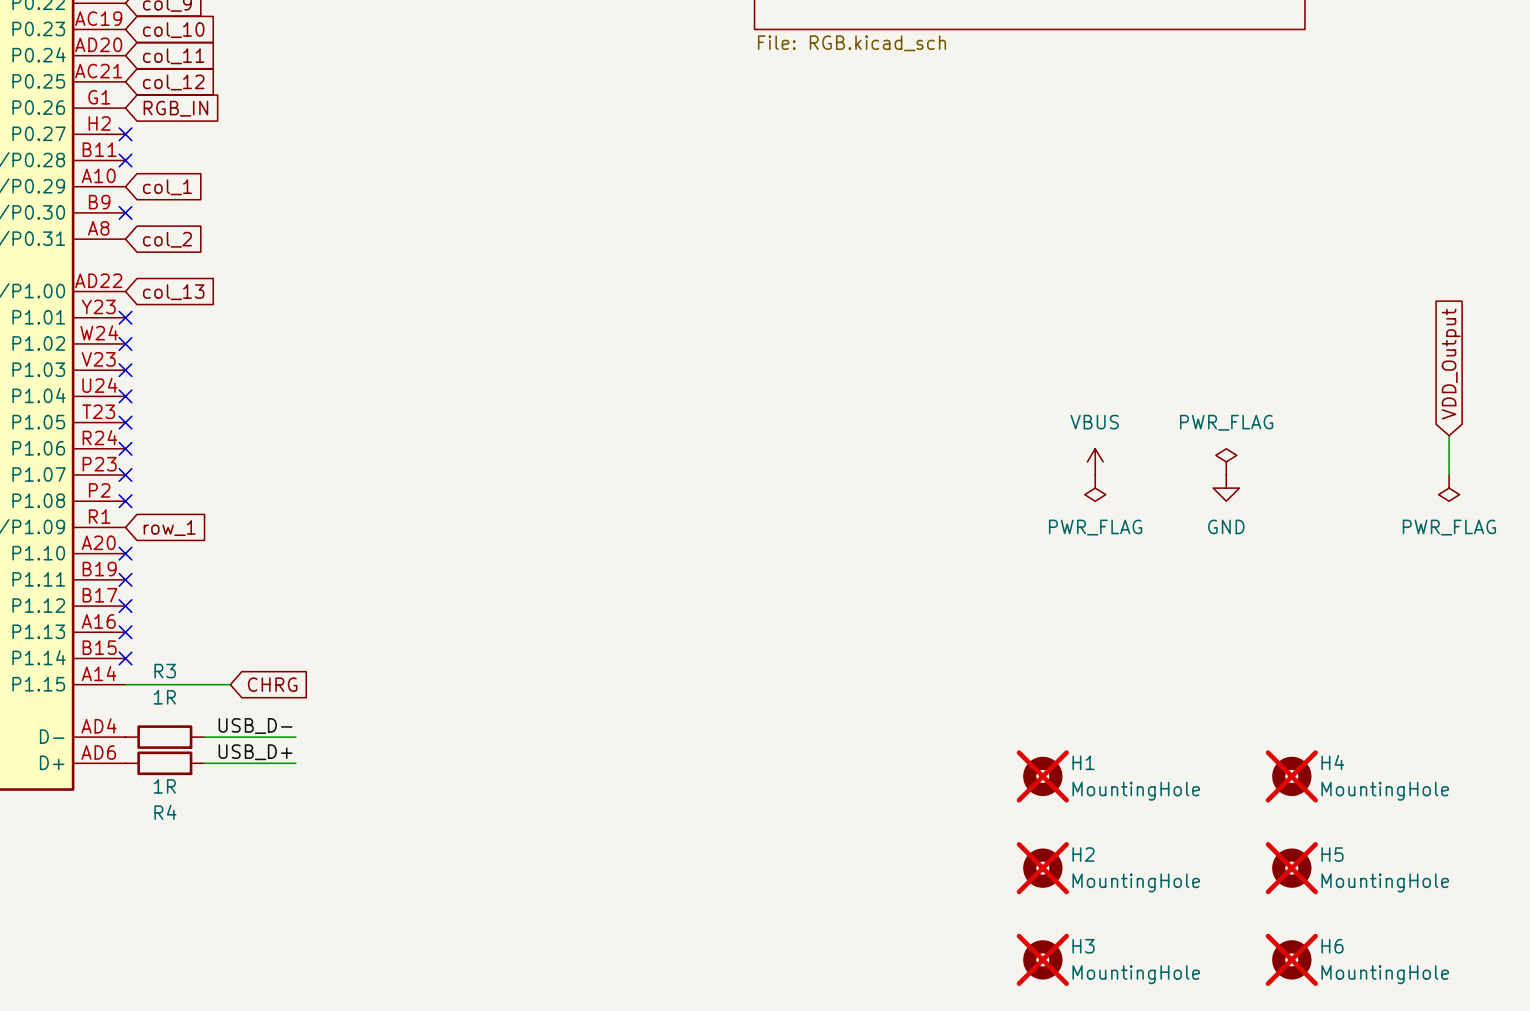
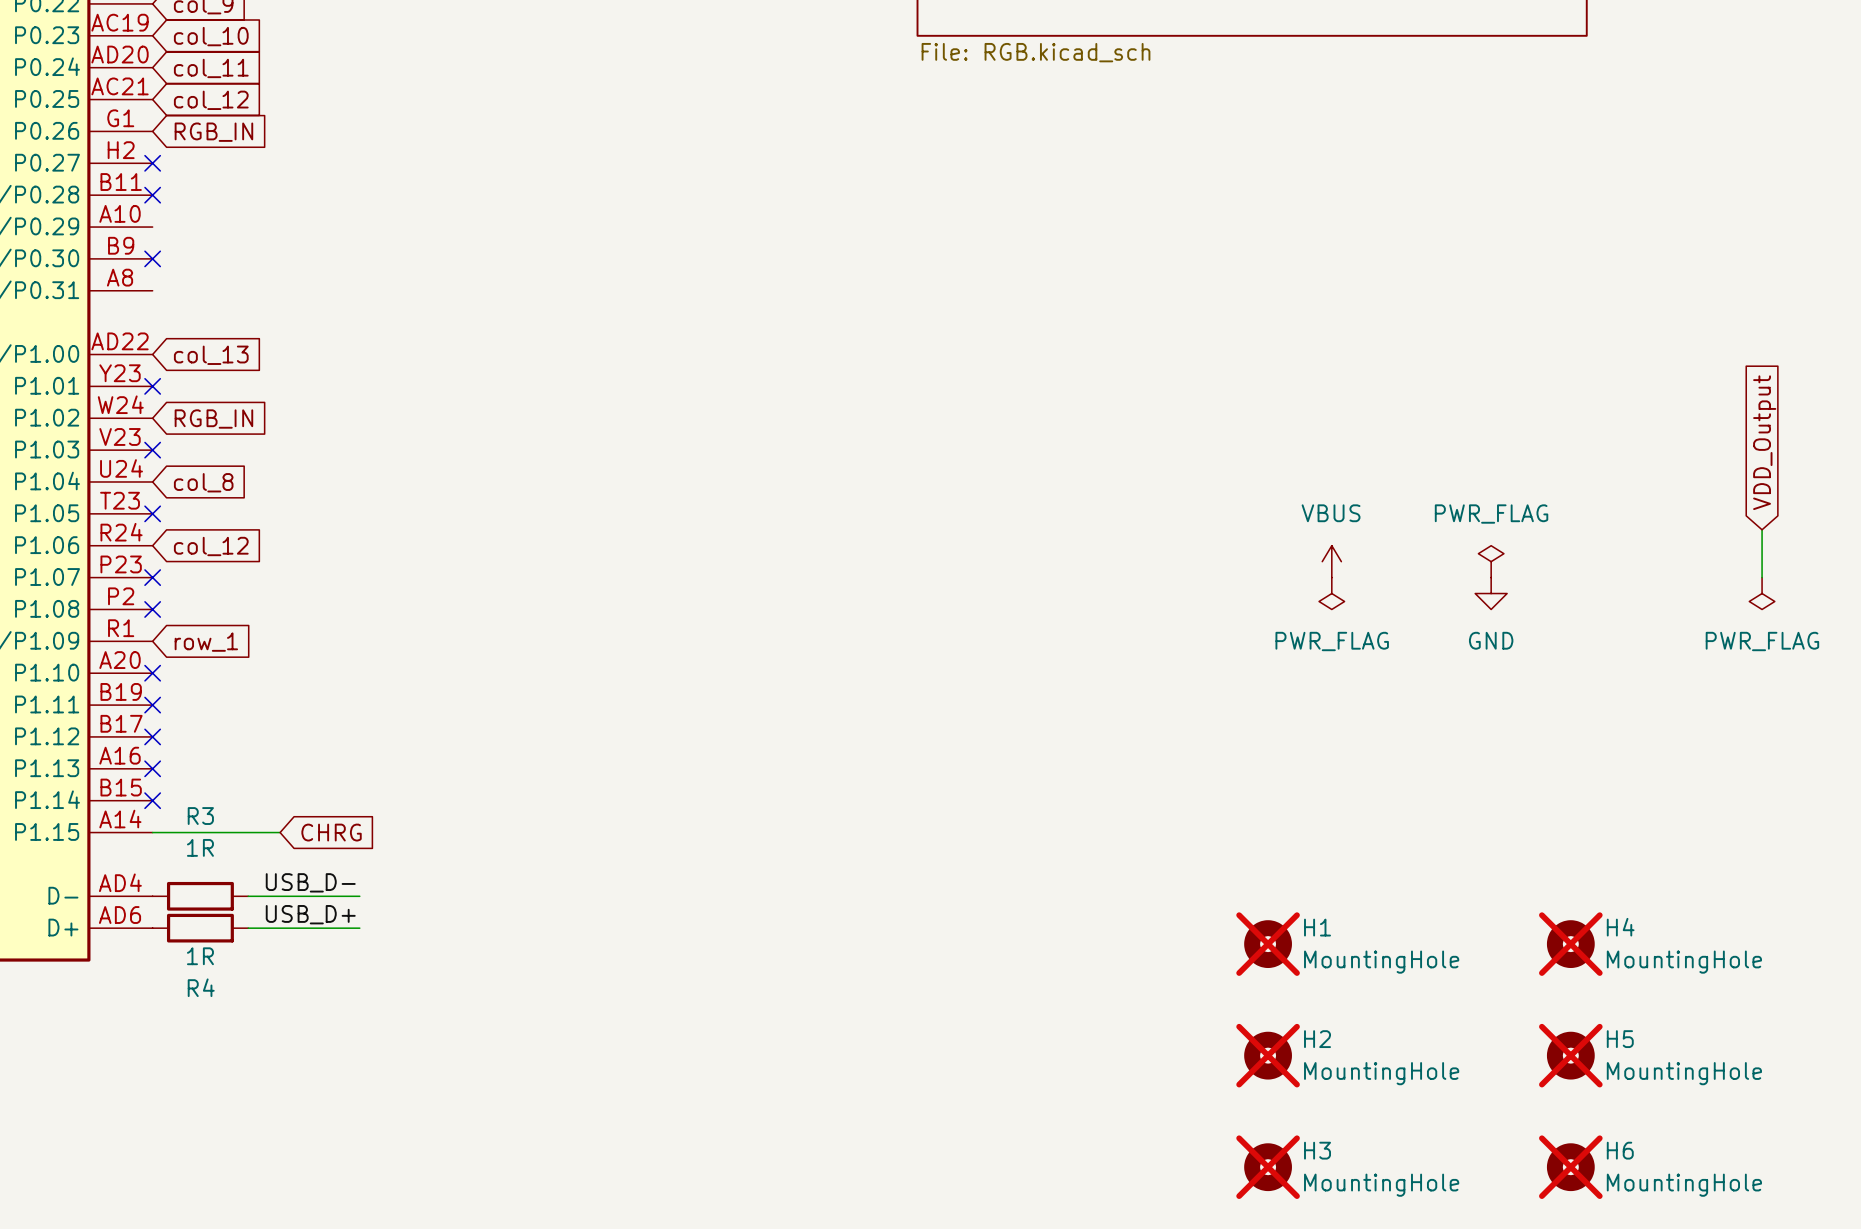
global label: col_1 (167, 187) -> none
global label: col_2 (167, 239) -> none
no-connect mark: (125, 343) -> none
global label: none -> RGB_IN (213, 419)
no-connect mark: (125, 396) -> none
global label: none -> col_8 (203, 482)
no-connect mark: (125, 448) -> none
global label: none -> col_12 (211, 546)

